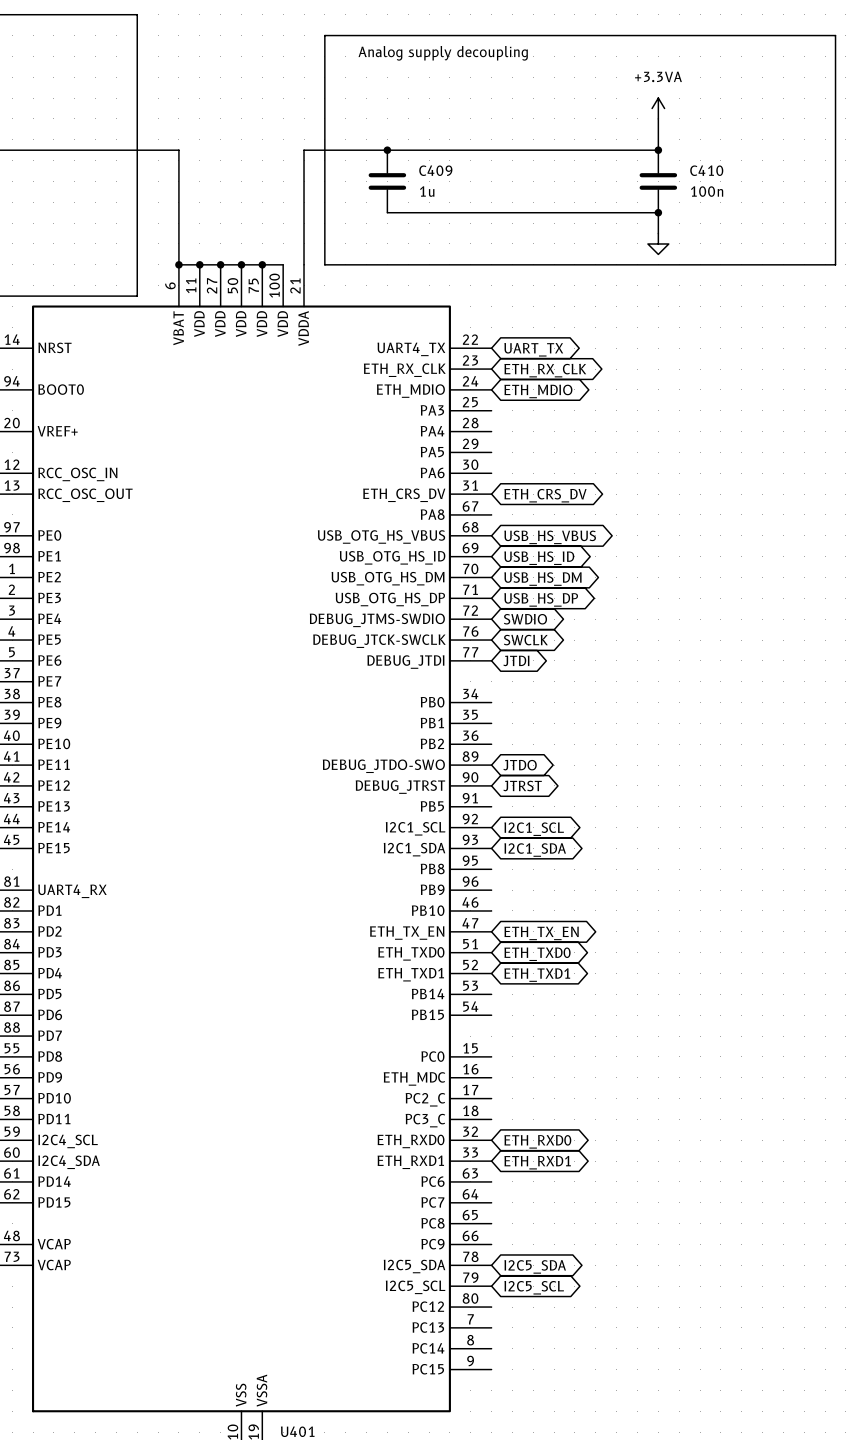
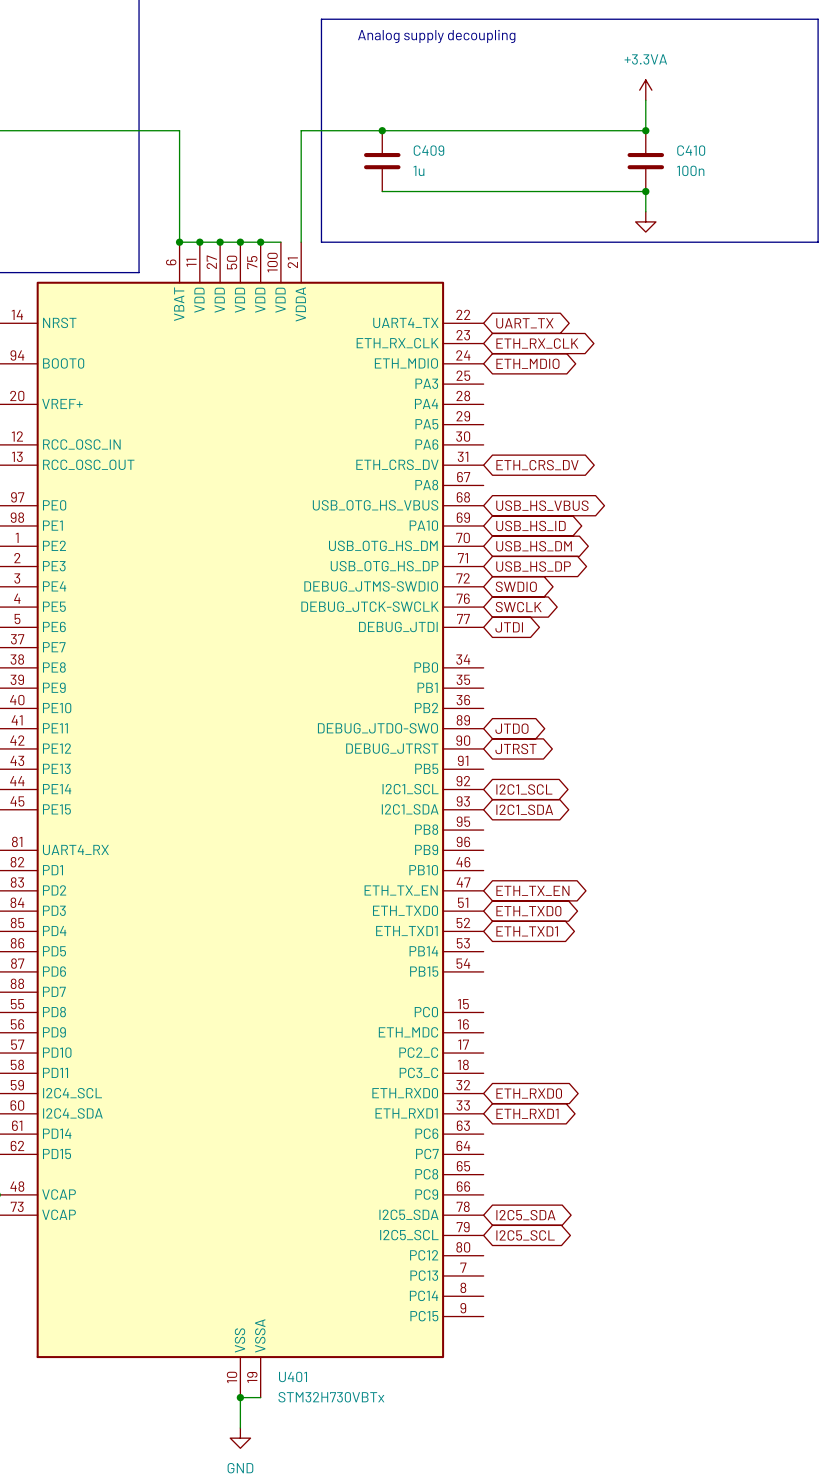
U401 pin name: USB_OTG_HS_ID (392, 557) -> PA10 (423, 525)

